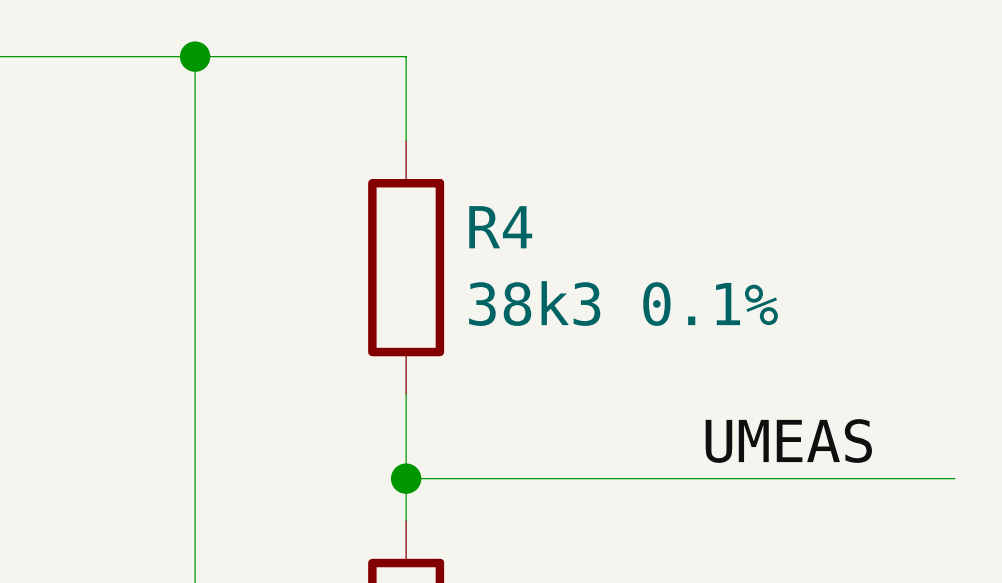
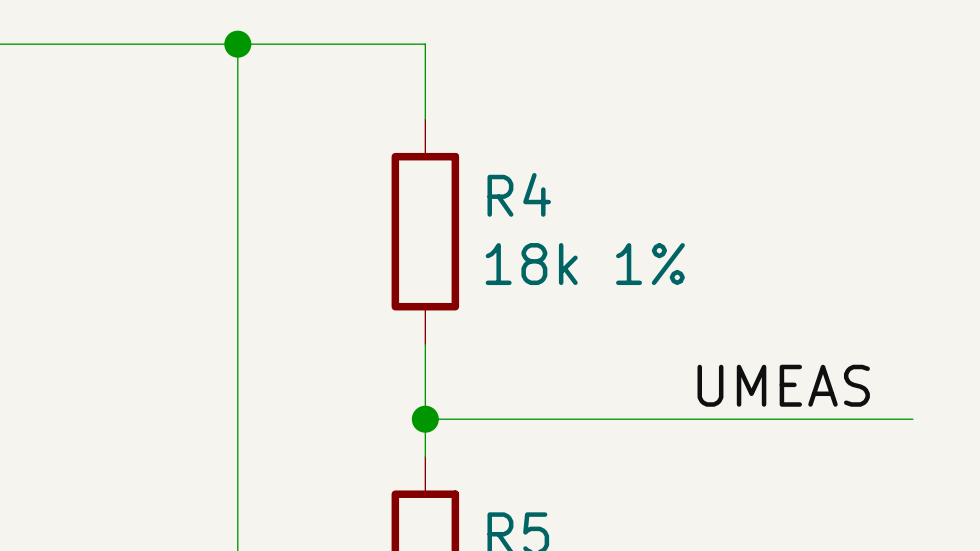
R4 value: 38k3 0.1% (623, 303) -> 18k 1% (585, 264)

